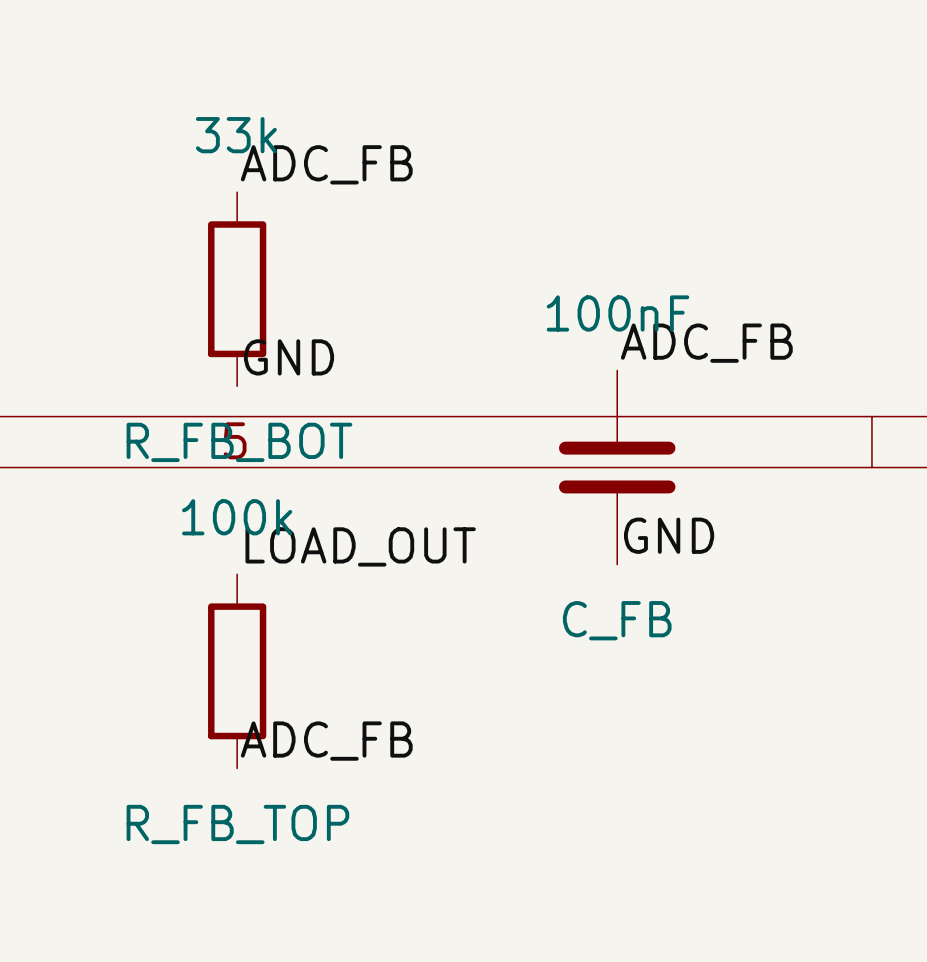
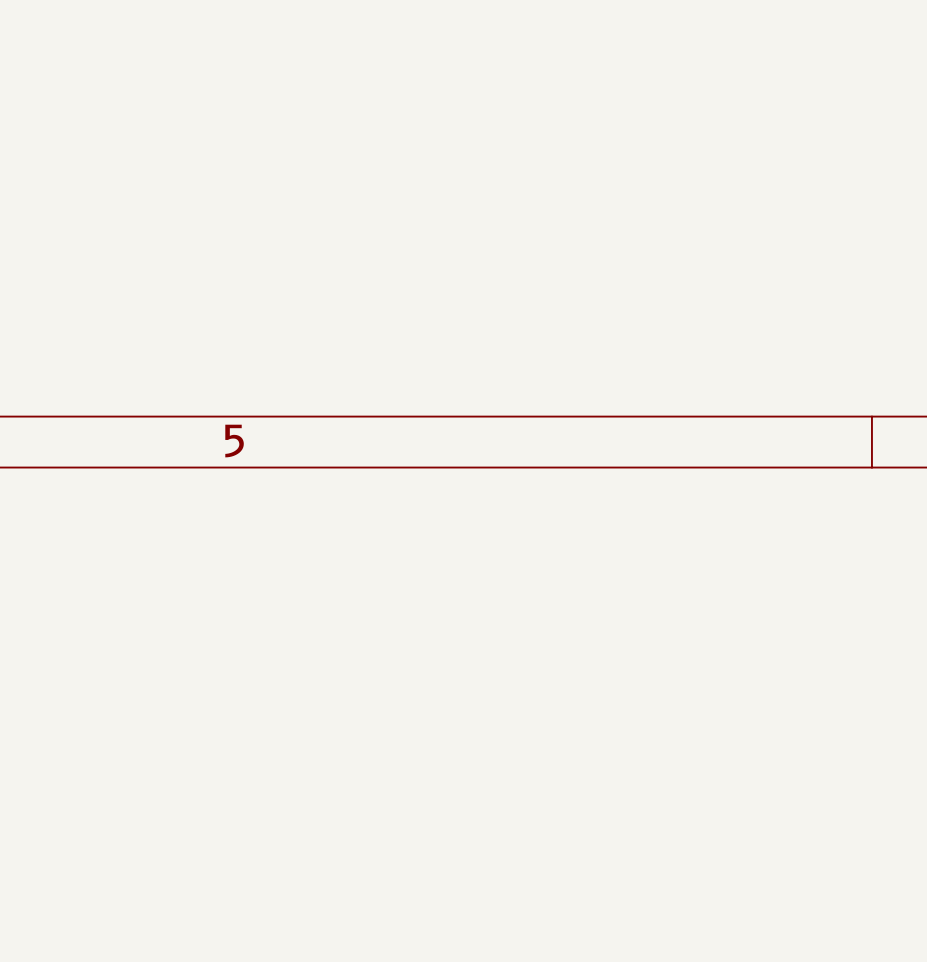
label: ADC_FB (326, 164) -> none
R_FB_BOT: 33k (237, 289) -> none
label: ADC_FB (706, 343) -> none
label: GND (289, 357) -> none
C_FB: 100nF (617, 467) -> none
label: GND (669, 535) -> none
label: LOAD_OUT (360, 546) -> none
R_FB_TOP: 100k (237, 671) -> none
label: ADC_FB (326, 741) -> none

